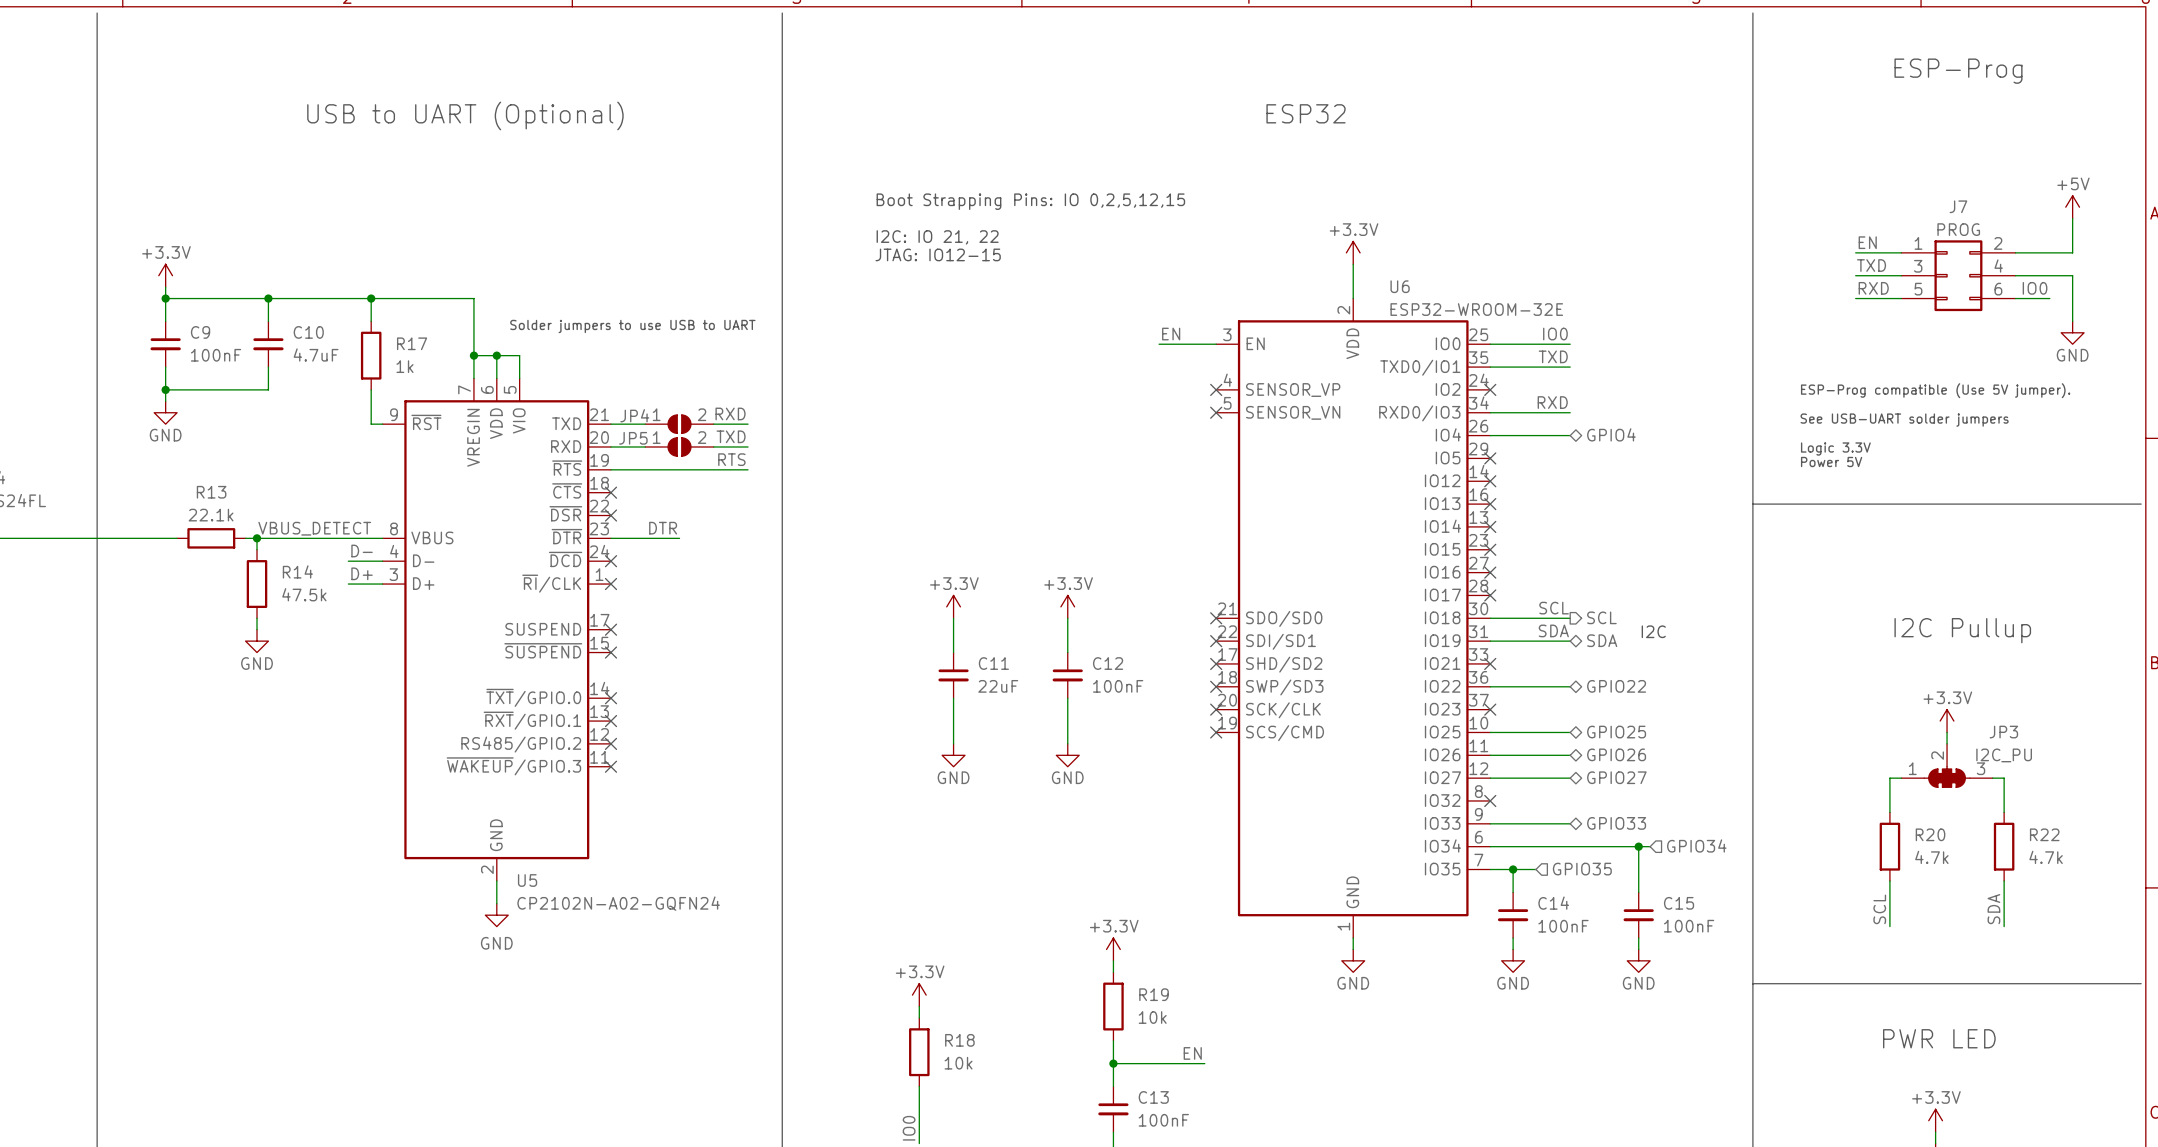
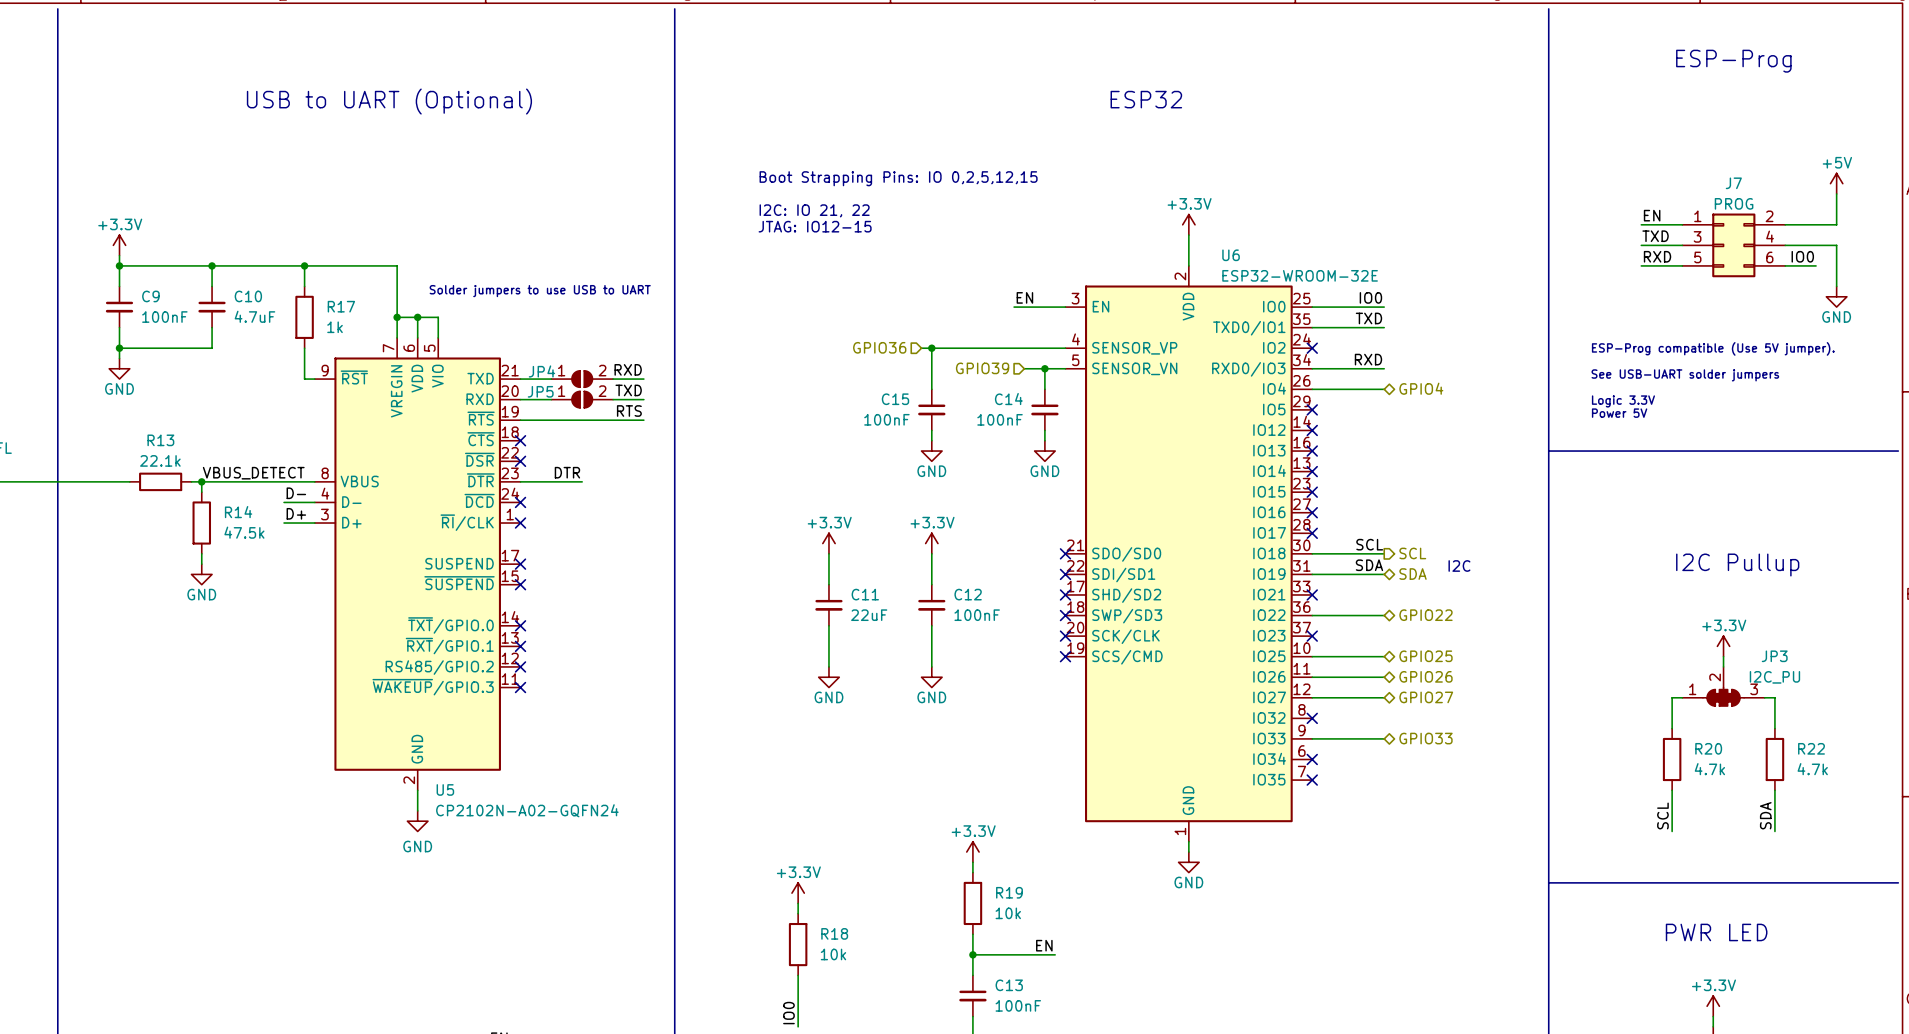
hierarchical label: none -> GPIO36 (879, 347)
wire: none -> (921, 348) (1065, 348)
wire: none -> (931, 348) (931, 389)
junction: none -> (931, 348)
no-connect mark: (1216, 389) -> none
hierarchical label: none -> GPIO39 (982, 368)
wire: none -> (1024, 368) (1065, 368)
wire: none -> (1044, 368) (1044, 389)
junction: none -> (1044, 368)
no-connect mark: (1216, 412) -> none
wire: none -> (931, 430) (931, 440)
wire: none -> (1044, 430) (1044, 440)
power symbol: none -> GND (931, 451)
power symbol: none -> GND (1044, 451)
hierarchical label: GPIO34 (1696, 845) -> none
wire: (1490, 846) (1650, 846) -> none
no-connect mark: none -> (1312, 759)
wire: (1638, 846) (1638, 892) -> none
junction: (1638, 846) -> none
wire: (1490, 869) (1535, 869) -> none
no-connect mark: none -> (1312, 780)
wire: (1513, 869) (1513, 892) -> none
junction: (1513, 869) -> none
hierarchical label: GPIO35 (1582, 869) -> none
C14 name position: C14 (1553, 903) -> C14 (1008, 399)
C15 name position: C15 (1679, 903) -> C15 (895, 399)
C14 position: (1513, 915) -> (1044, 409)
C15 position: (1638, 915) -> (931, 409)
C14 value position: 100nF (1563, 926) -> 100nF (1000, 419)
C15 value position: 100nF (1689, 926) -> 100nF (886, 419)
wire: (1513, 938) (1513, 949) -> none
wire: (1638, 938) (1638, 949) -> none
power symbol: GND (1513, 960) -> none
power symbol: GND (1638, 960) -> none

